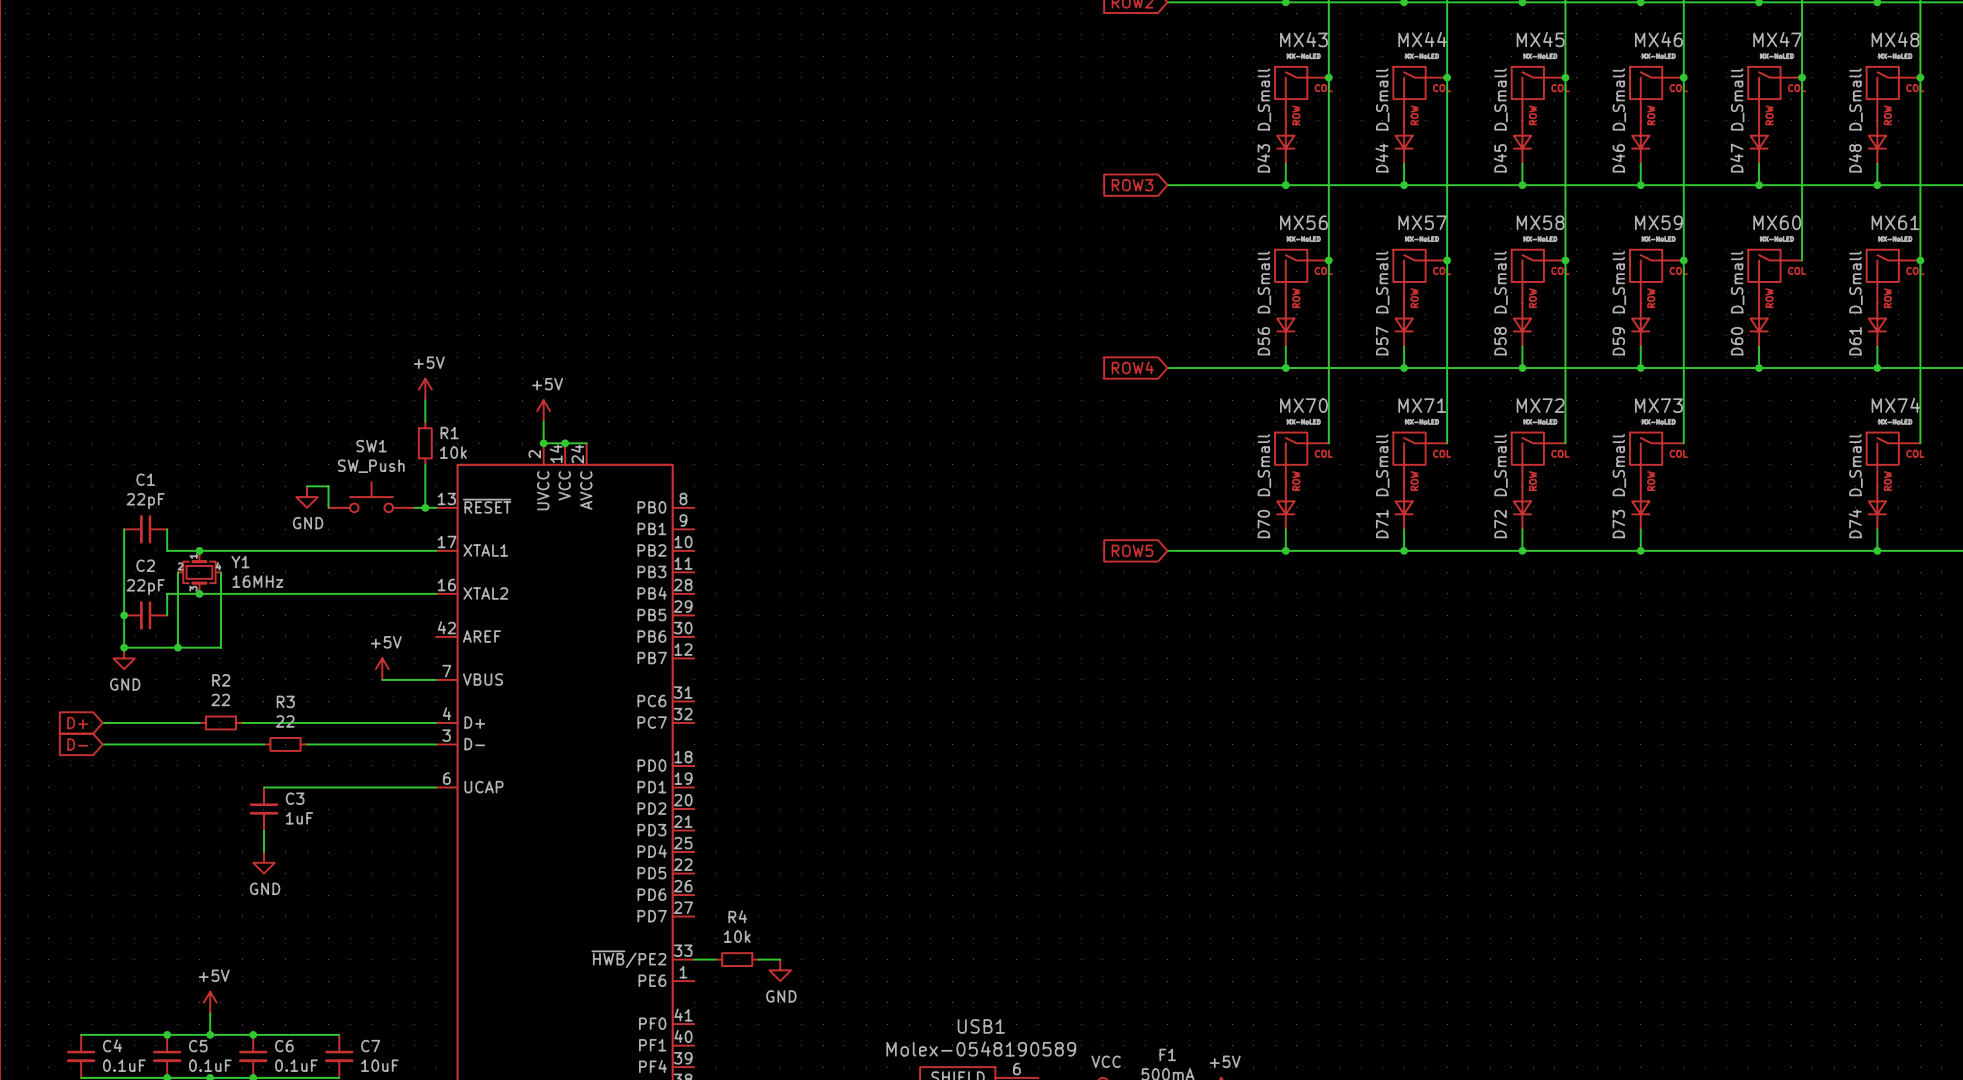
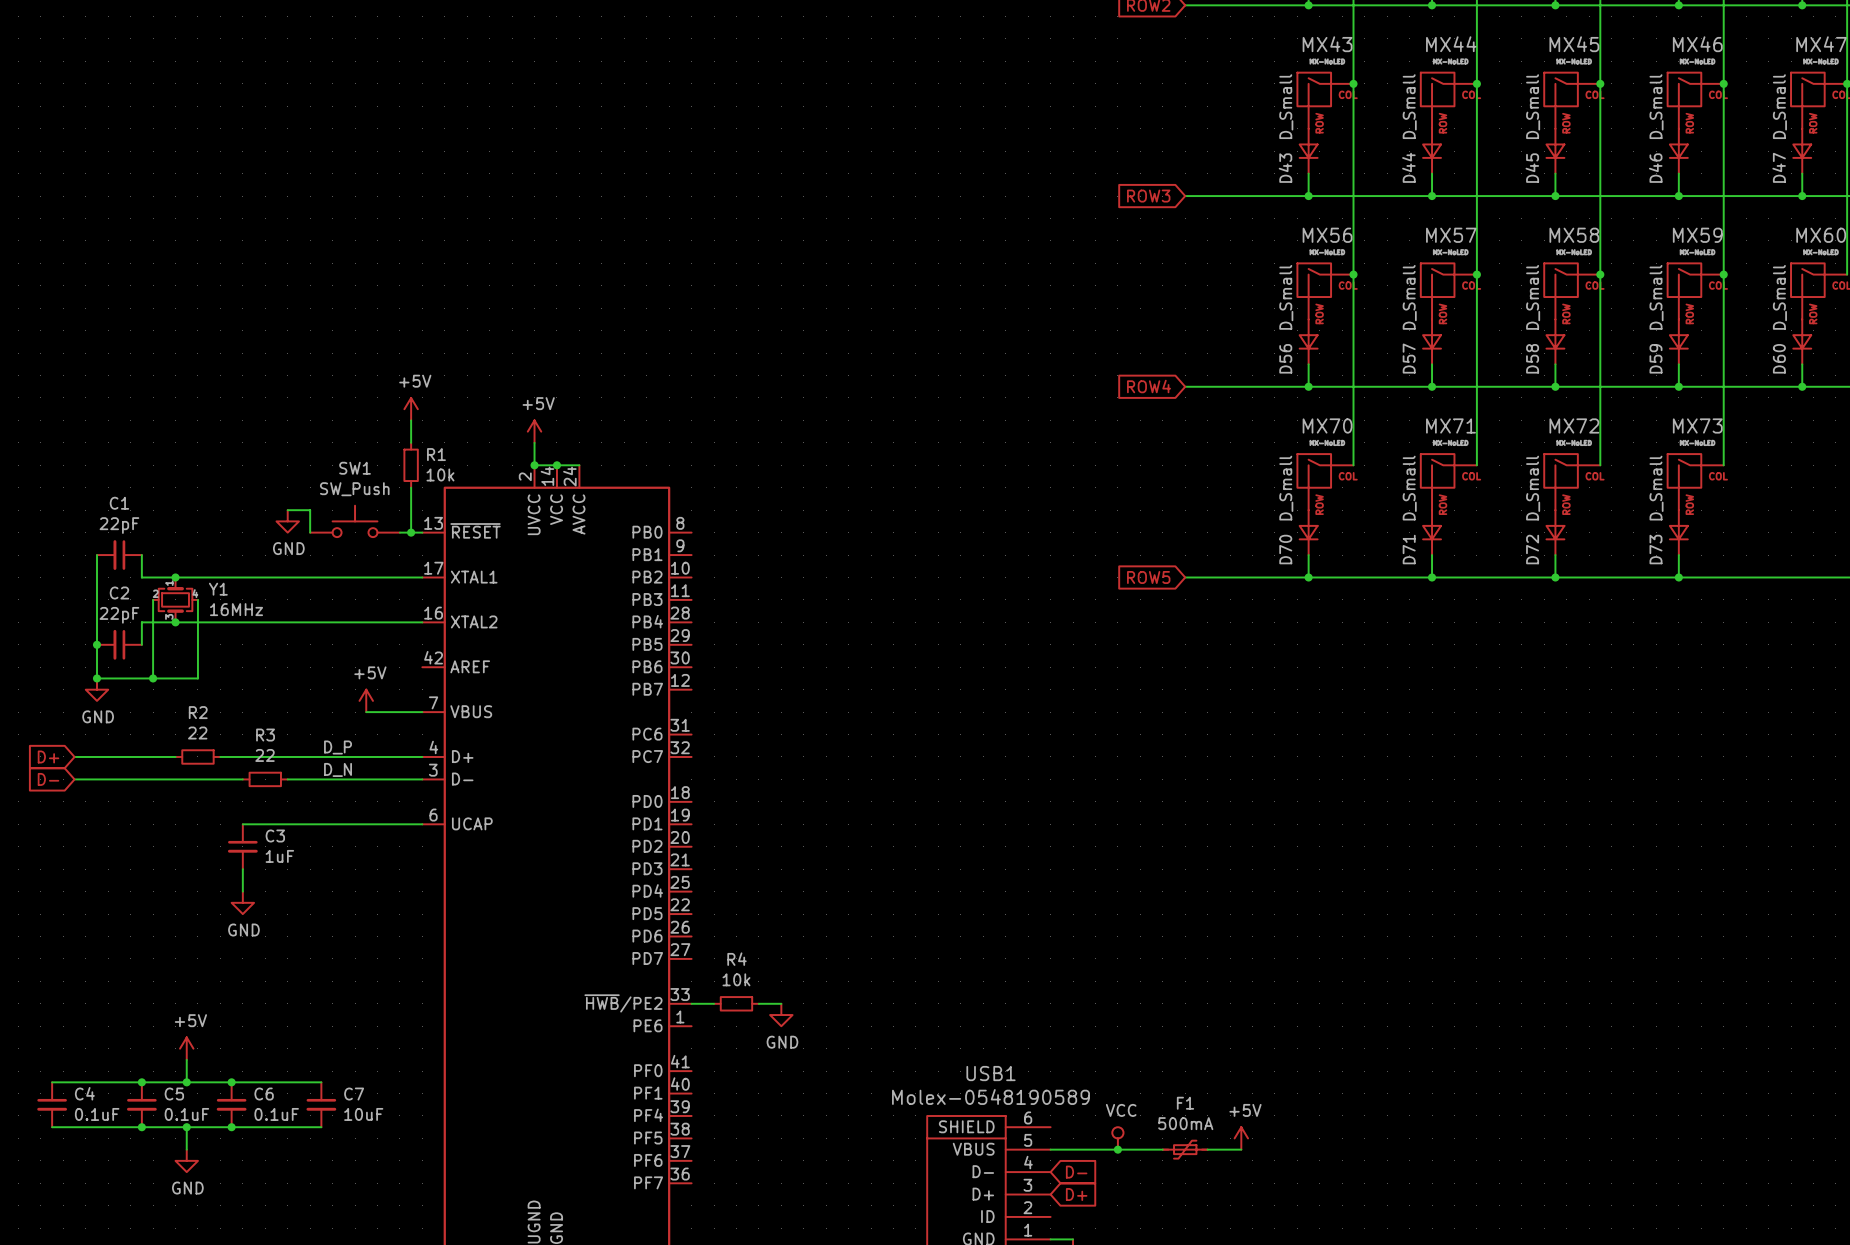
label: none -> D_P (338, 747)
label: none -> D_N (338, 769)

